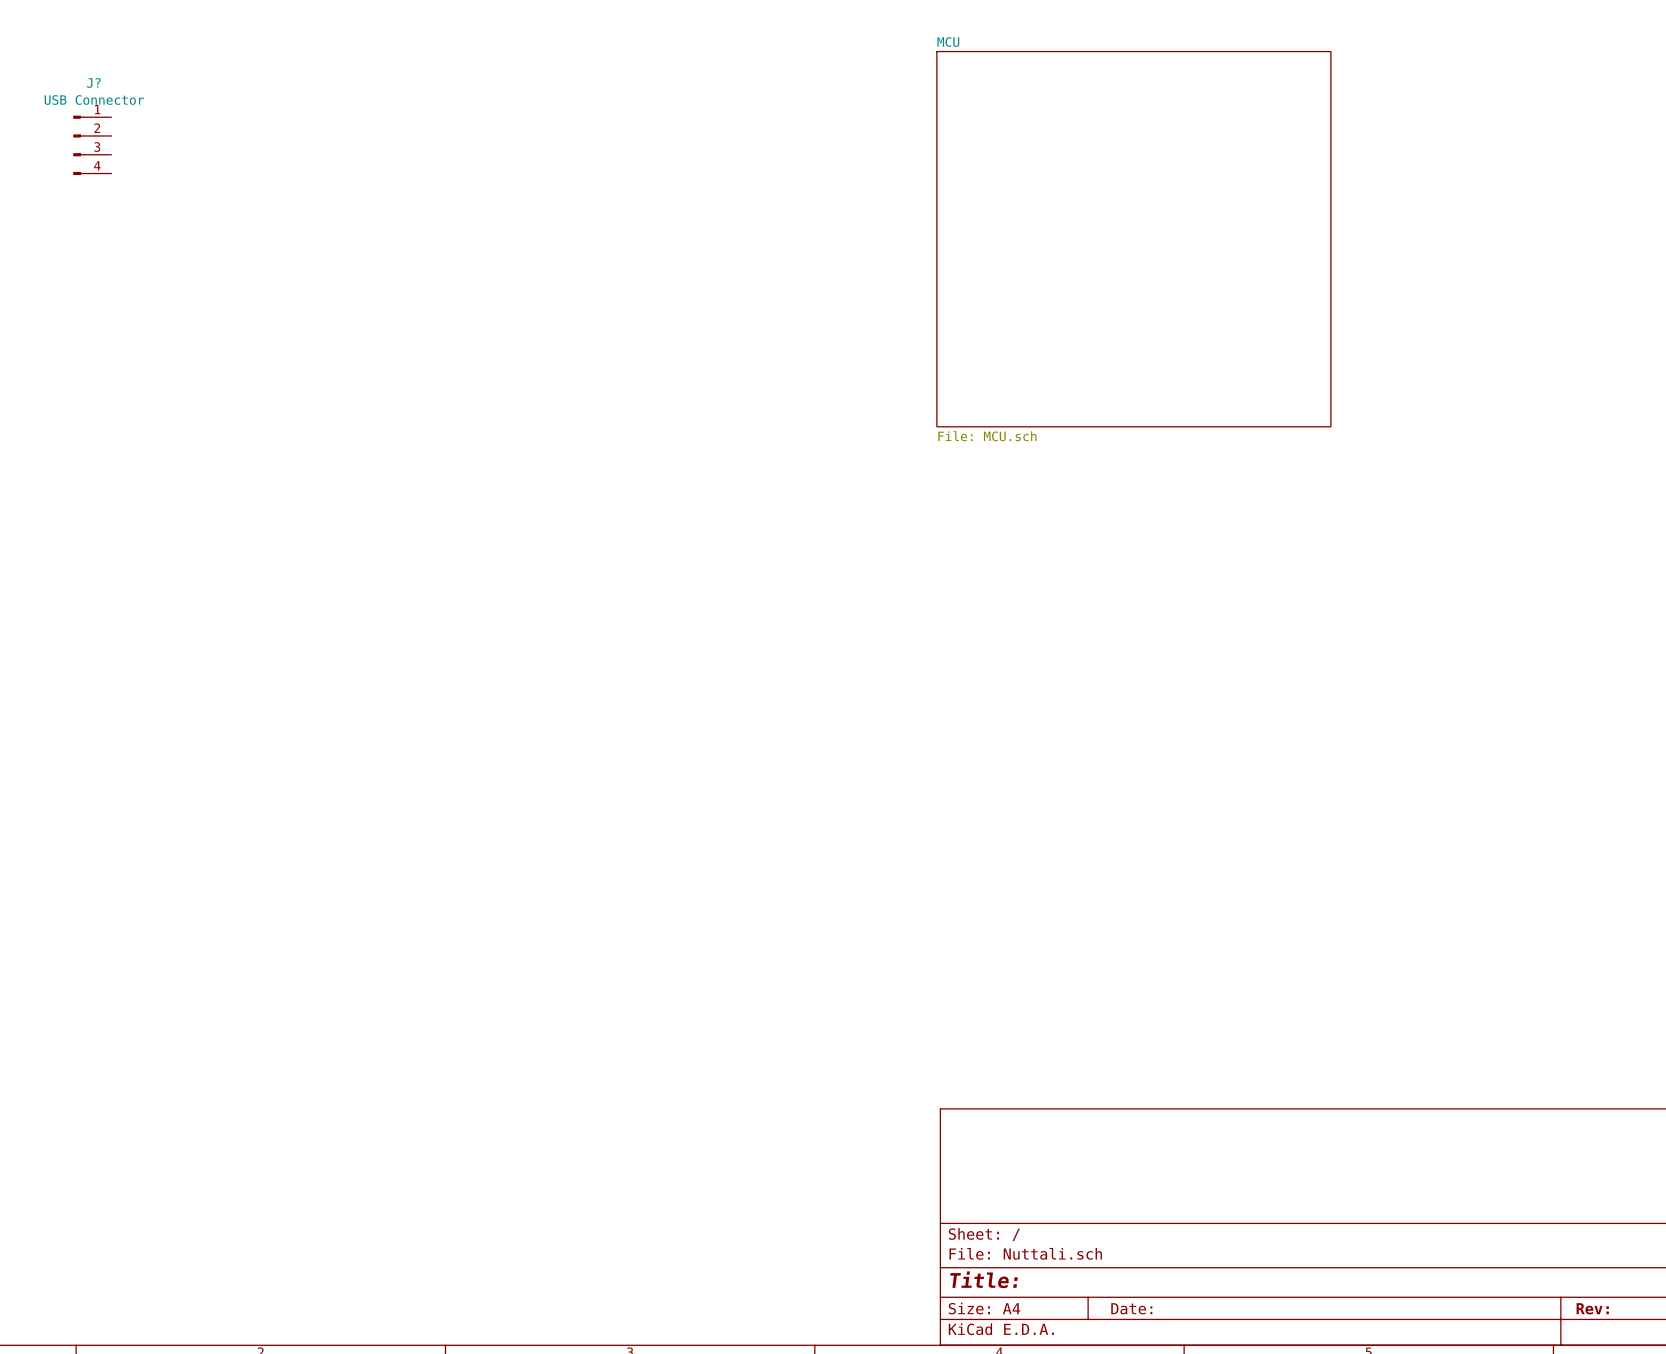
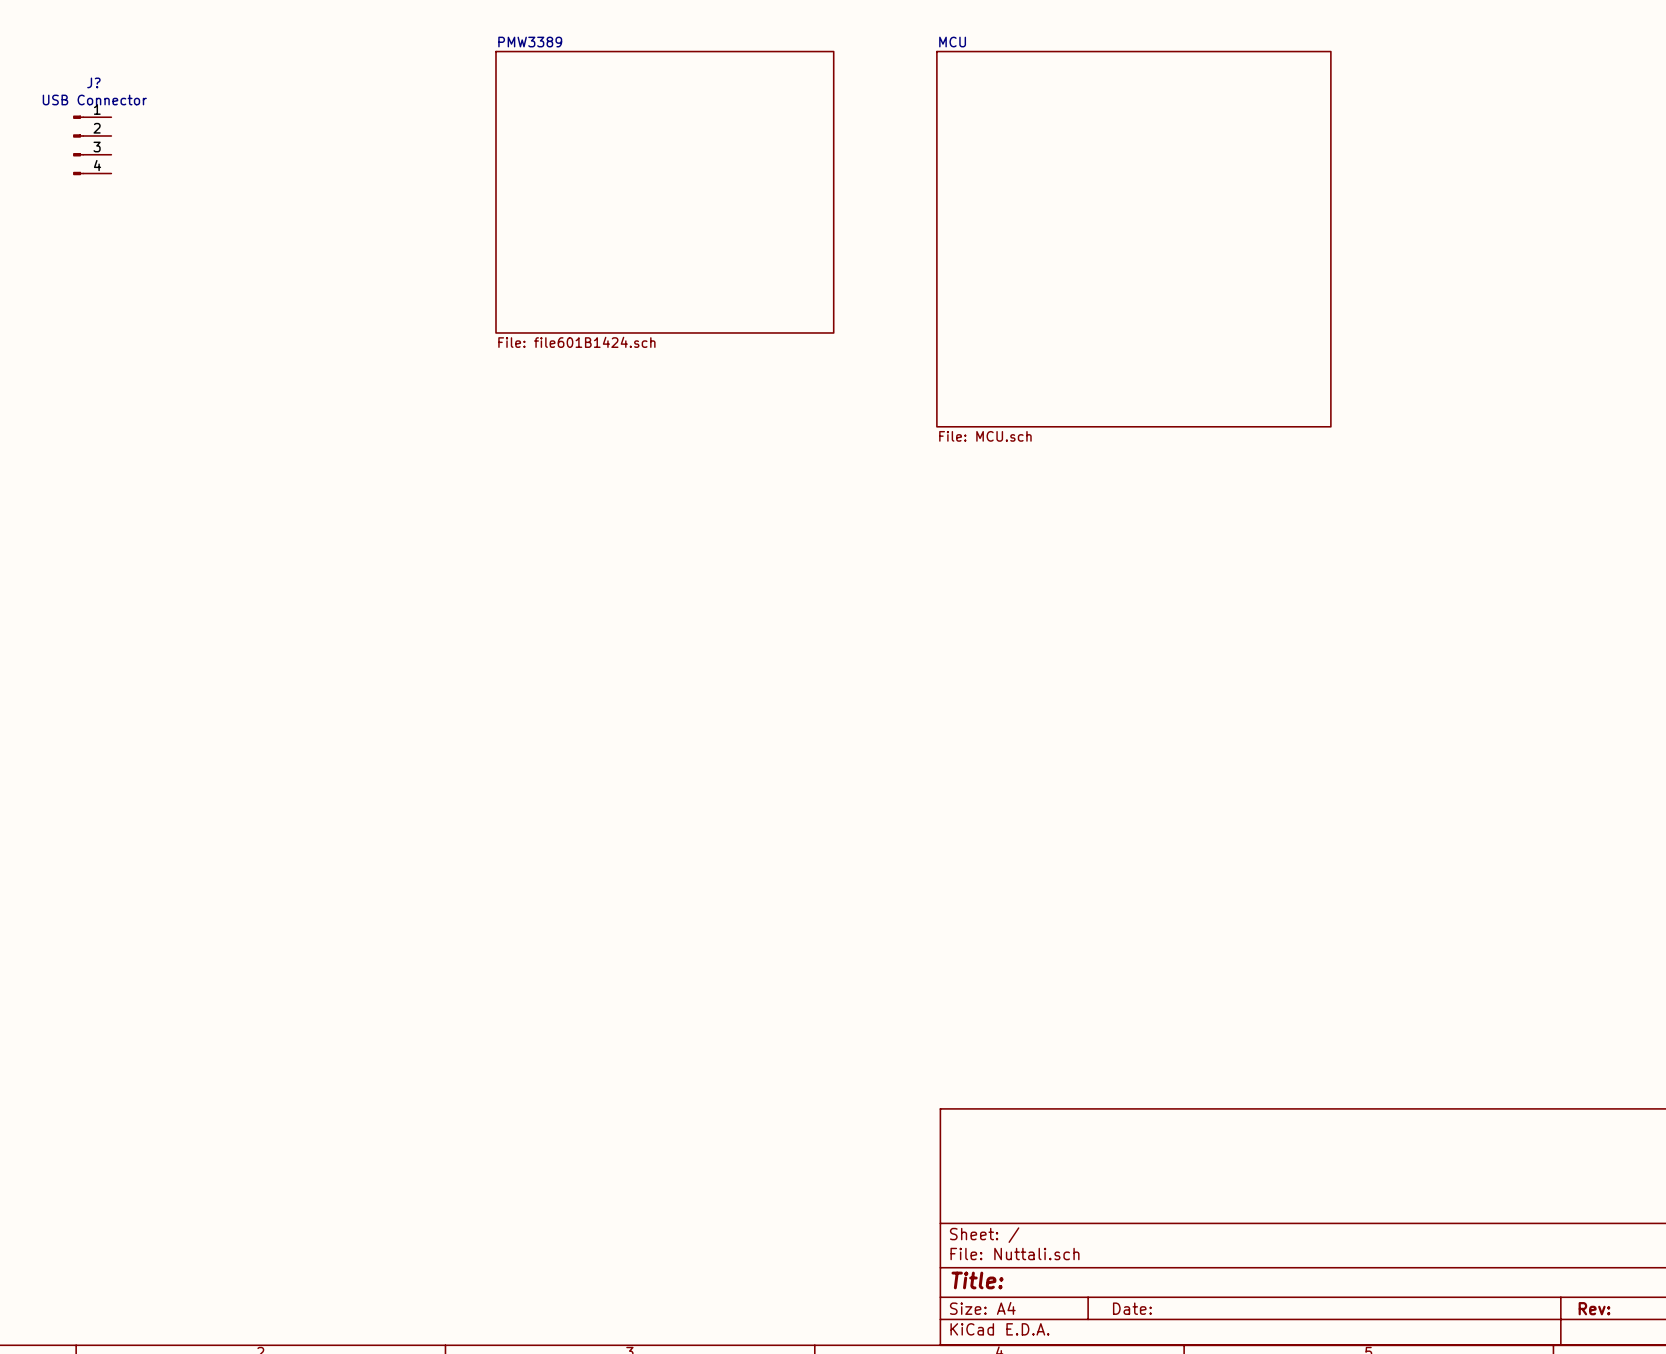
sheet PMW3389: none -> File: file601B1424.sch (664, 192)

